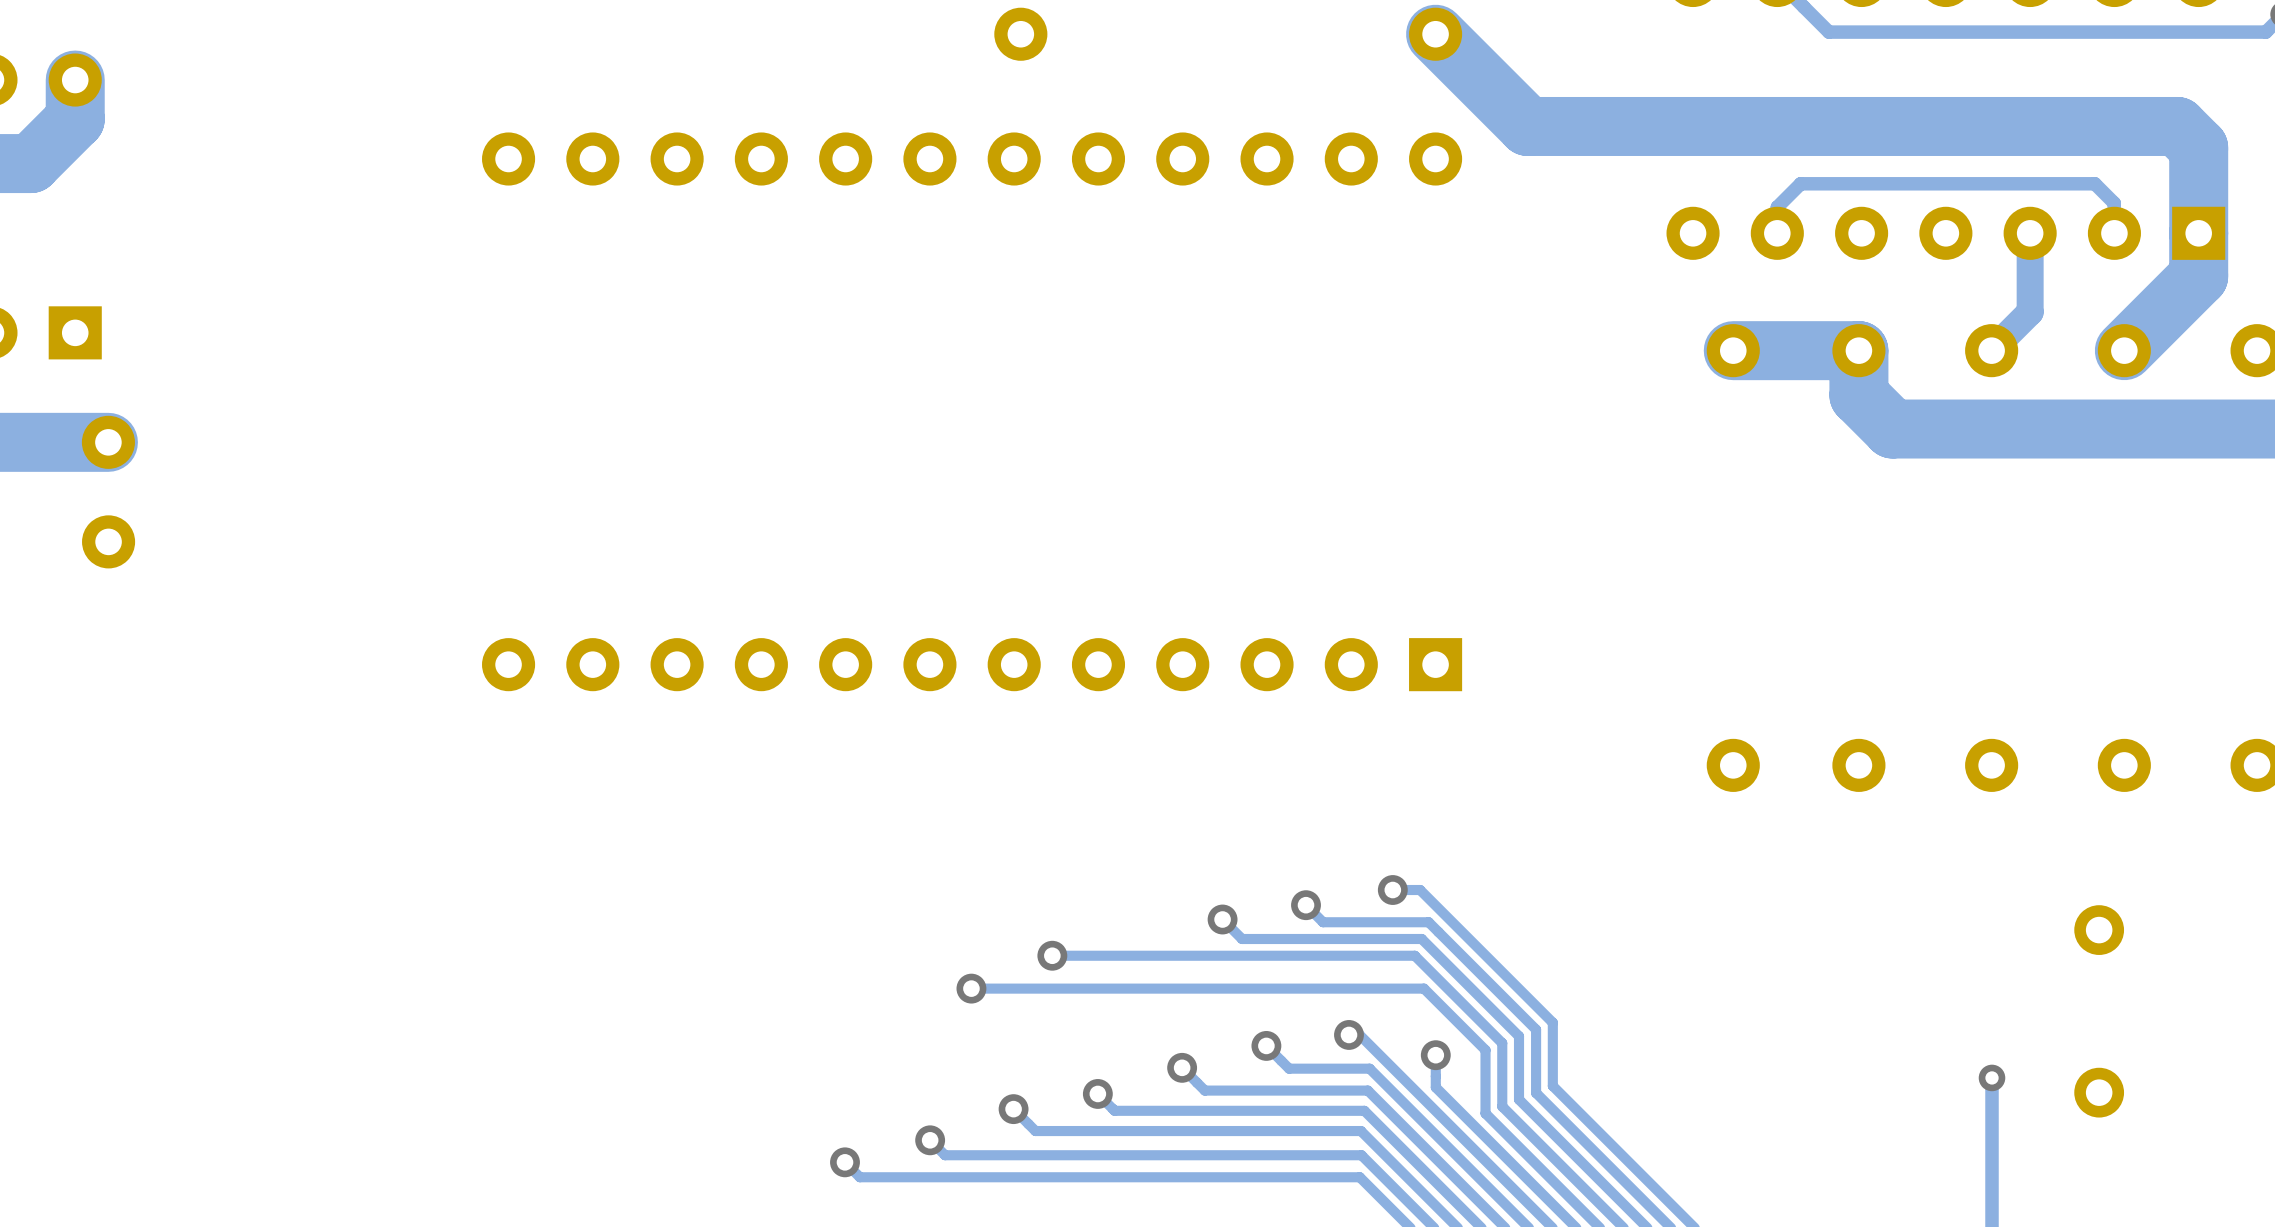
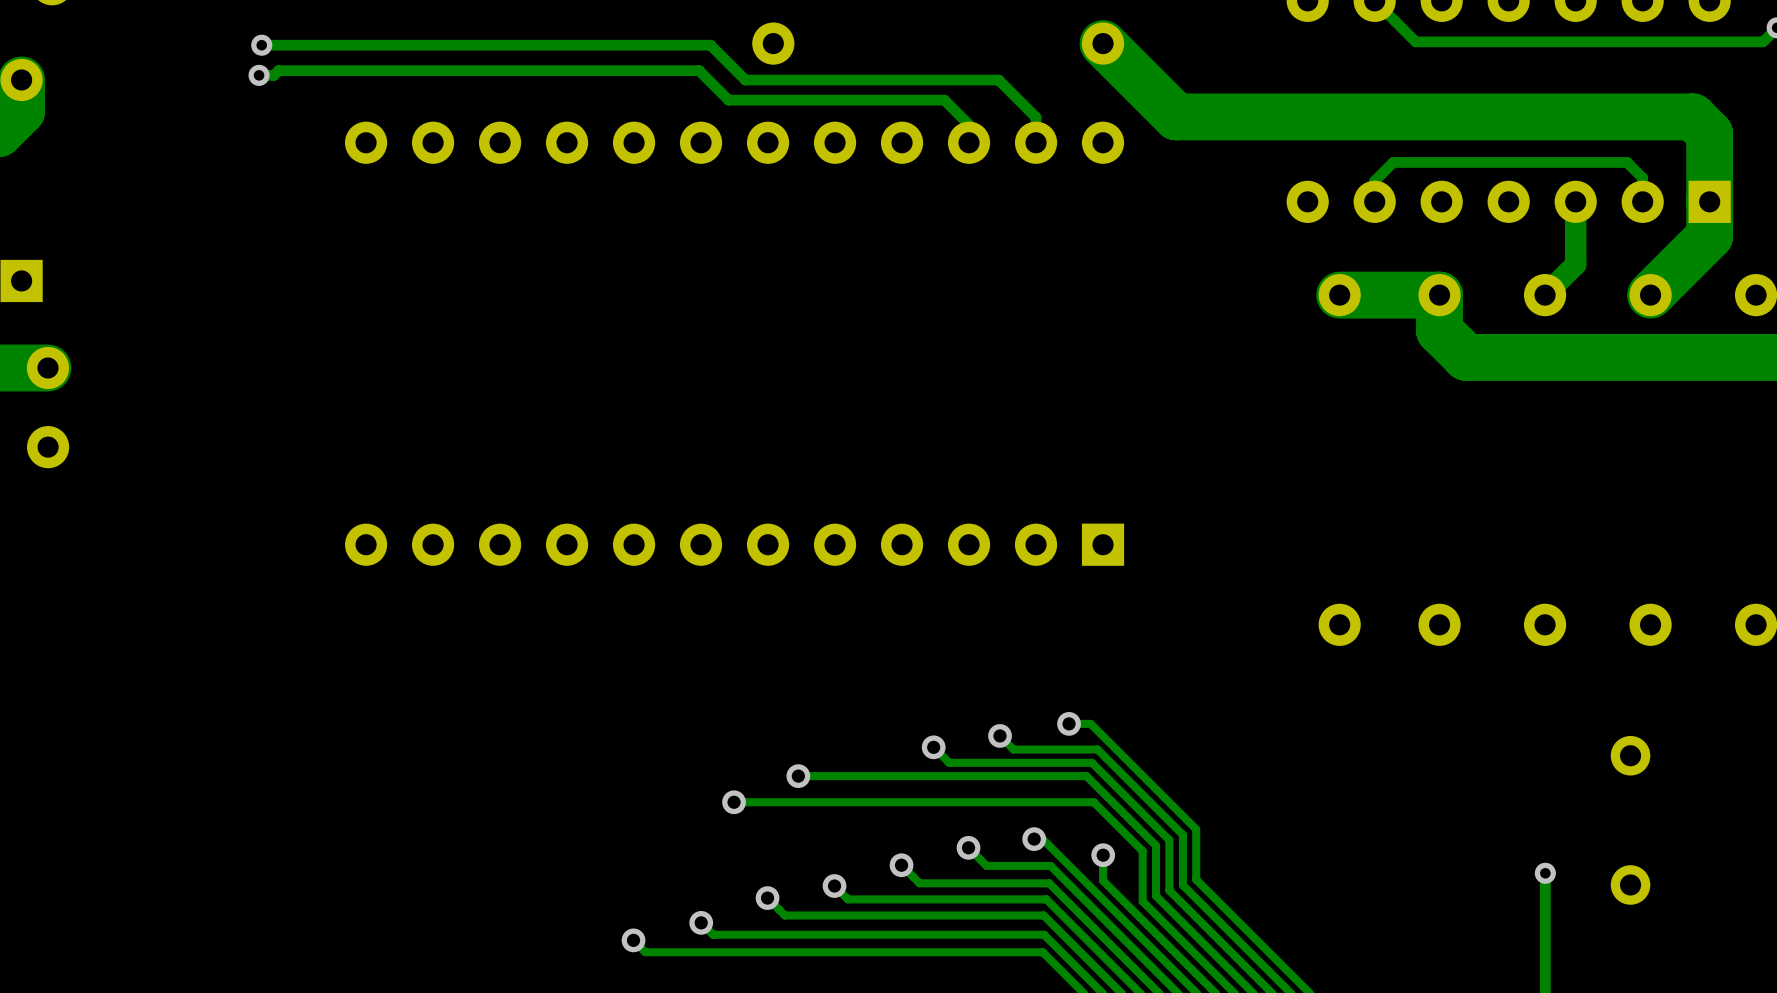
track: none -> (261, 45) (710, 45) (745, 80) (998, 80) (1036, 117) (1036, 142)
via: none -> (261, 45)
track: none -> (259, 75) (273, 75) (278, 70) (699, 70) (728, 100) (944, 100) (969, 124) (969, 142)
via: none -> (259, 75)

